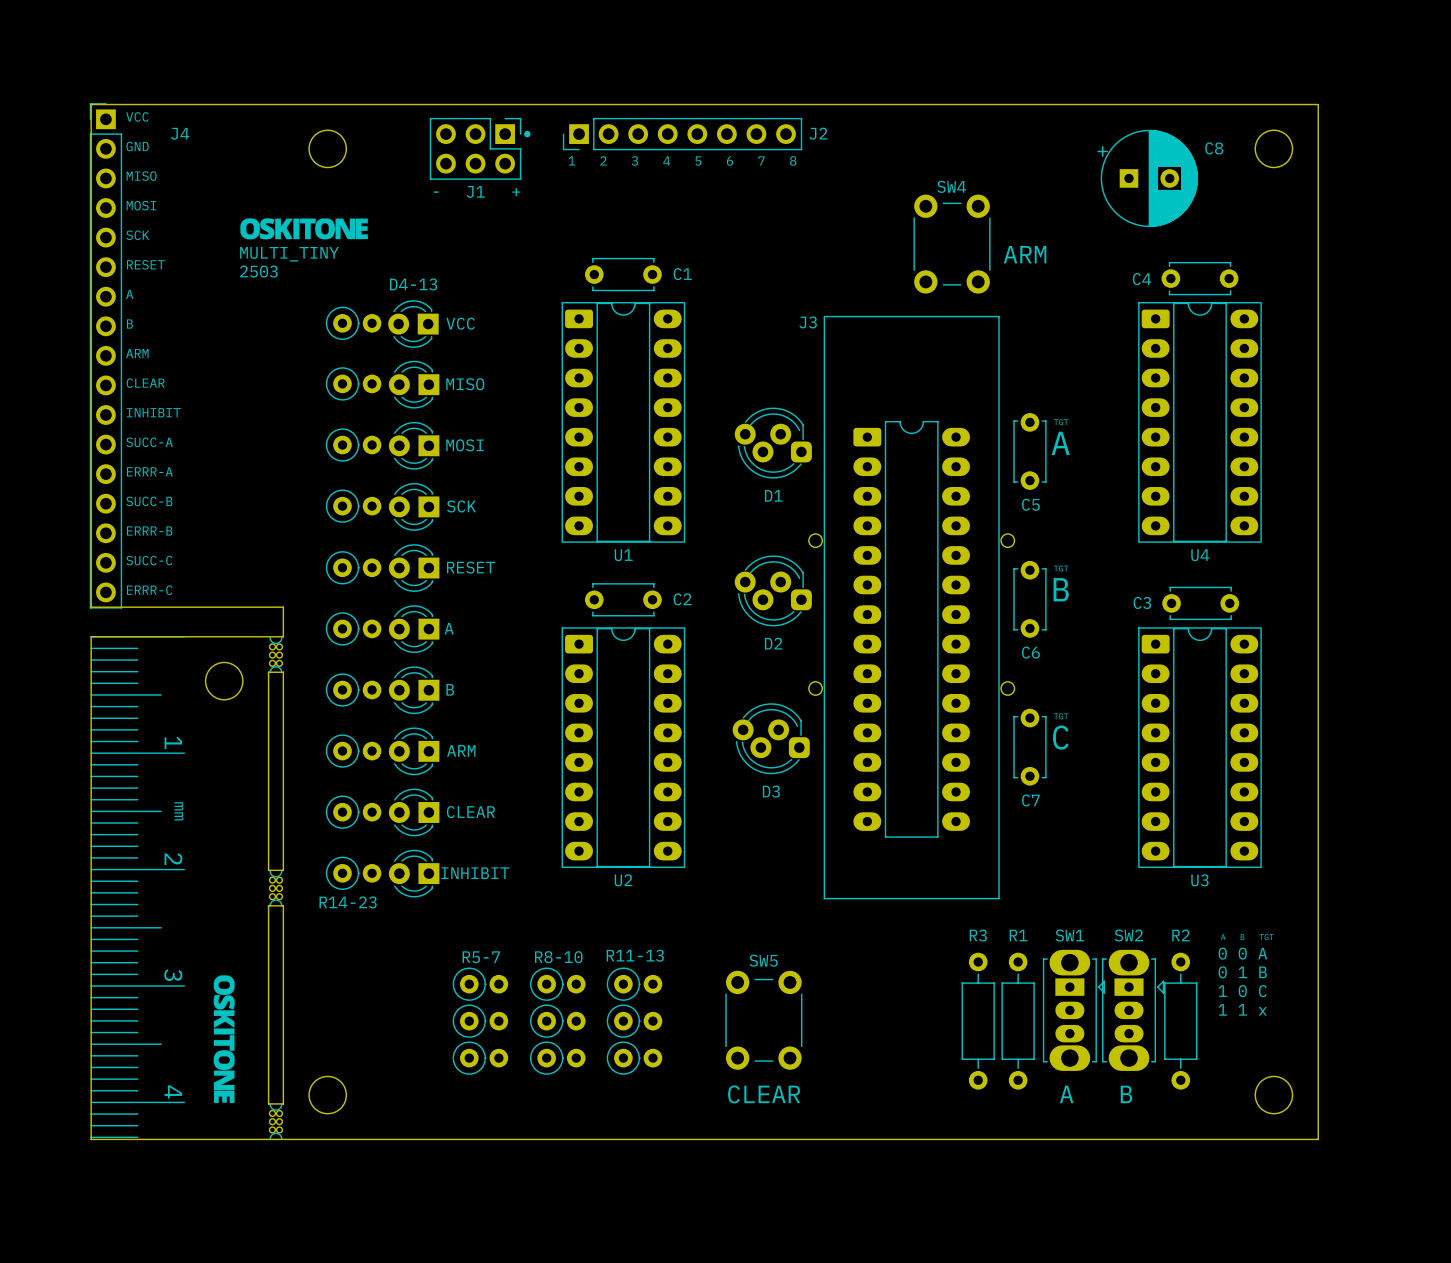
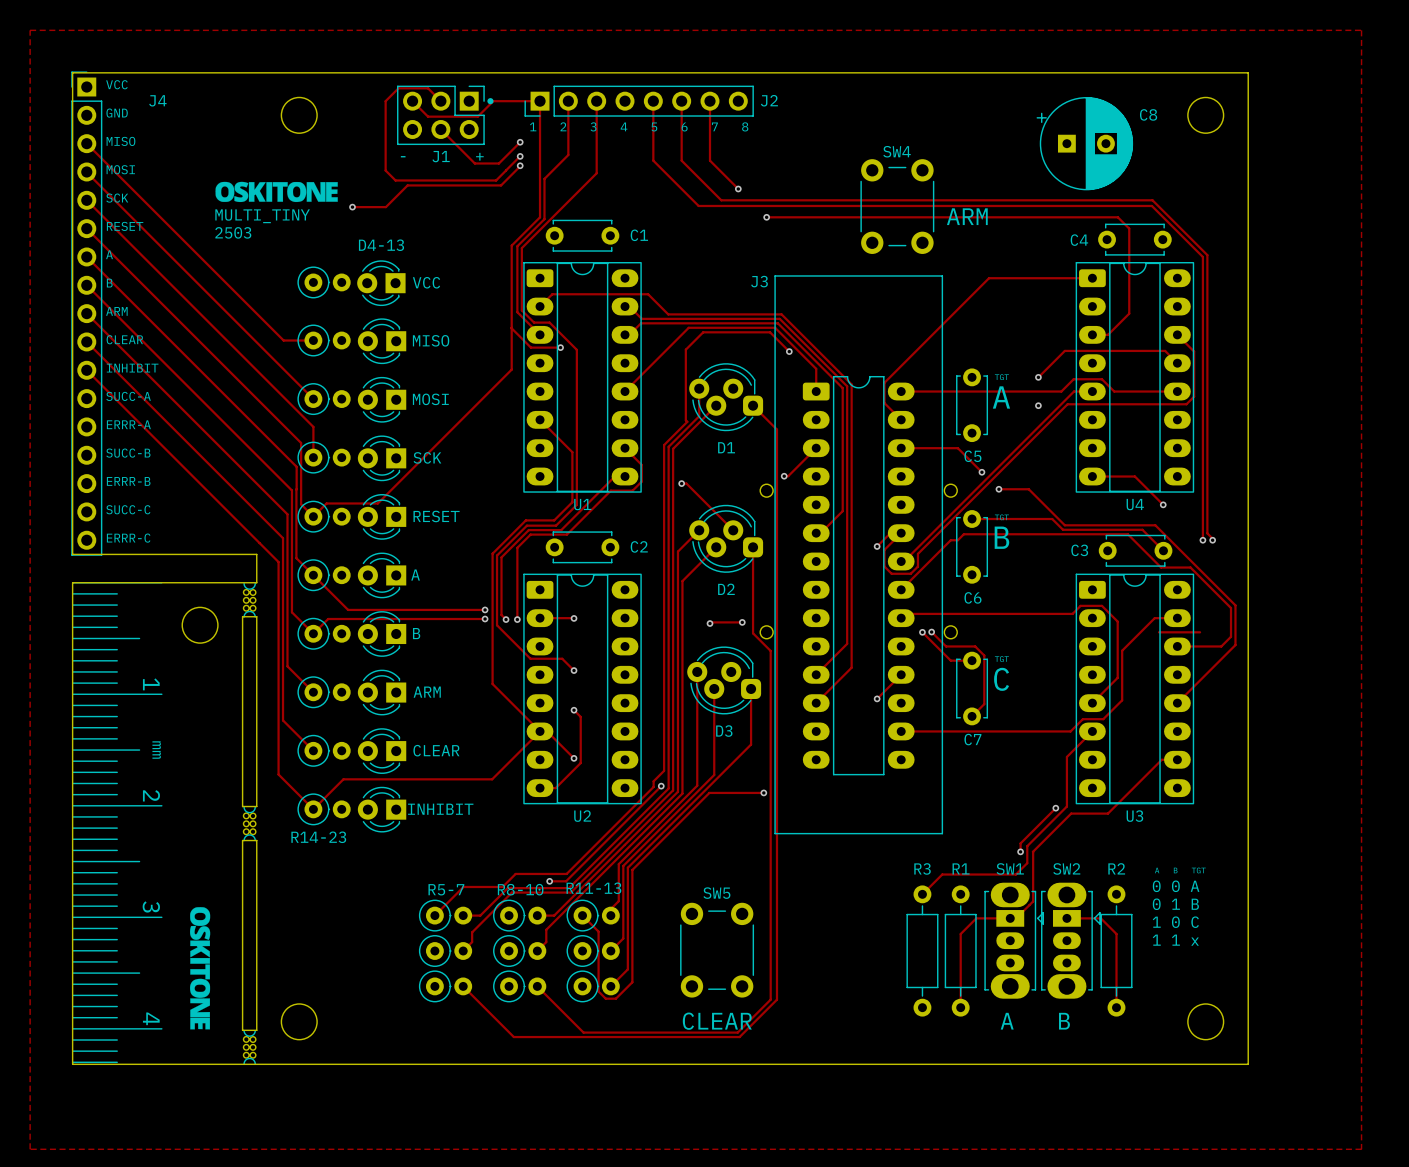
zone outline: none -> (30, 30) (1361, 30) (1361, 1149) (30, 1149) (30, 30)
track: none -> (412, 101) (428, 116) (477, 116) (493, 101) (540, 101) (540, 217) (511, 245) (511, 369) (377, 503) (326, 503) (313, 516) (301, 504) (301, 442) (86, 228)
track: none -> (440, 101) (428, 88) (398, 88) (385, 101) (385, 170) (395, 180) (496, 180) (506, 170)
track: none -> (568, 101) (568, 154) (544, 178) (544, 219) (517, 246) (517, 312) (540, 334)
track: none -> (596, 101) (596, 173) (521, 248) (521, 310) (534, 322) (549, 322) (576, 349) (576, 504) (556, 525) (526, 525) (497, 555) (497, 625) (530, 658) (562, 658) (574, 670)
track: none -> (653, 101) (653, 160) (698, 205) (1151, 205) (1202, 256) (1202, 540)
track: none -> (681, 101) (681, 160) (721, 200) (1152, 200) (1207, 255) (1207, 533) (1212, 540)
track: none -> (710, 101) (710, 160) (738, 188)
track: none -> (440, 129) (474, 163) (498, 163) (520, 142)
via: none -> (520, 142)
track: none -> (86, 143) (283, 340) (313, 340)
track: none -> (520, 156) (506, 170)
via: none -> (520, 156)
track: none -> (520, 165) (501, 185) (407, 185) (385, 207) (352, 207)
via: none -> (520, 165)
track: none -> (86, 171) (313, 399)
via: none -> (738, 188)
track: none -> (86, 200) (313, 426) (313, 457)
via: none -> (352, 207)
track: none -> (766, 217) (1117, 217) (1129, 228) (1129, 313) (1108, 334) (1092, 334)
via: none -> (766, 217)
track: none -> (86, 256) (296, 466) (296, 558) (348, 609) (485, 609)
track: none -> (1092, 278) (989, 278) (884, 382) (884, 403) (901, 419)
track: none -> (86, 285) (291, 490) (291, 612) (313, 633) (328, 619) (485, 619)
track: none -> (540, 306) (552, 294) (648, 294) (668, 314) (781, 314) (851, 384) (851, 667) (816, 703)
track: none -> (625, 306) (629, 306) (641, 318) (779, 318) (847, 386) (847, 643) (816, 674)
track: none -> (86, 313) (287, 514) (287, 666) (313, 692)
track: none -> (511, 328) (530, 347) (560, 347)
track: none -> (625, 334) (629, 334) (641, 323) (777, 323) (842, 388) (842, 511) (820, 533) (816, 533)
track: none -> (1177, 334) (1194, 351) (1194, 396) (1186, 404) (1067, 404) (917, 553) (917, 566) (910, 573) (891, 573) (884, 566) (884, 549) (901, 533) (890, 533) (877, 546)
track: none -> (86, 341) (283, 538) (283, 720) (313, 750)
via: none -> (560, 347)
track: none -> (789, 351) (770, 332) (703, 332) (685, 349) (687, 421) (664, 445) (664, 770) (653, 781) (653, 786) (566, 873) (515, 873) (502, 886) (463, 886) (434, 915)
via: none -> (789, 351)
track: none -> (1177, 363) (1165, 350) (1064, 350) (1038, 377)
track: none -> (86, 370) (278, 562) (278, 774) (313, 809) (343, 779) (492, 779) (540, 731)
via: none -> (1038, 377)
track: none -> (699, 388) (699, 416) (668, 446) (668, 788) (569, 888) (507, 888) (480, 915) (463, 915)
track: none -> (625, 391) (688, 327) (775, 327) (816, 368) (816, 391)
track: none -> (901, 391) (1061, 391) (1073, 379) (1101, 379) (1114, 391) (1177, 391)
track: none -> (1092, 391) (1074, 391) (904, 561) (901, 561)
track: none -> (716, 405) (673, 448) (673, 790) (570, 892) (511, 892) (472, 932) (472, 942) (463, 951)
track: none -> (753, 405) (776, 429) (776, 999) (739, 1037) (513, 1037) (463, 986)
via: none -> (1038, 405)
track: none -> (540, 419) (572, 452) (572, 502) (554, 520) (525, 520) (492, 553) (492, 684) (540, 731)
track: none -> (625, 448) (641, 464) (641, 481) (632, 490) (610, 490) (566, 534) (530, 534) (517, 547) (517, 619)
track: none -> (816, 448) (788, 476) (784, 476)
track: none -> (901, 448) (957, 448) (981, 472)
via: none -> (981, 472)
track: none -> (625, 476) (614, 476) (561, 530) (528, 530) (501, 557) (501, 615) (506, 619)
via: none -> (784, 476)
track: none -> (1092, 476) (1134, 476) (1163, 504)
track: none -> (681, 483) (686, 483) (733, 530)
via: none -> (681, 483)
track: none -> (998, 489) (1028, 489) (1064, 525) (1155, 525) (1235, 605) (1235, 645) (1177, 703)
via: none -> (998, 489)
via: none -> (1163, 504)
track: none -> (972, 519) (1052, 519) (1063, 529) (1142, 529) (1163, 550)
track: none -> (699, 530) (677, 551) (677, 791) (554, 915) (537, 915)
via: none -> (1202, 540)
via: none -> (1212, 540)
via: none -> (877, 546)
track: none -> (716, 547) (682, 581) (682, 793) (546, 929) (546, 942) (537, 951)
track: none -> (753, 547) (753, 633) (770, 650) (770, 999) (737, 1032) (583, 1032) (537, 986)
track: none -> (901, 589) (950, 540) (957, 540) (963, 534) (1127, 534) (1161, 567) (1190, 567) (1231, 608) (1231, 636) (1221, 646) (1177, 646)
via: none -> (485, 609)
track: none -> (540, 618) (574, 618)
track: none -> (901, 618) (905, 613) (1072, 613) (1080, 605) (1101, 605) (1117, 621) (1117, 677) (1092, 703)
track: none -> (1177, 618) (1154, 618) (1122, 650) (1122, 700) (1103, 719) (1082, 719) (1070, 731) (901, 731)
via: none -> (485, 619)
via: none -> (574, 618)
via: none -> (506, 619)
via: none -> (517, 619)
track: none -> (742, 622) (710, 623)
via: none -> (742, 622)
via: none -> (710, 623)
track: none -> (922, 632) (950, 660) (972, 660)
via: none -> (922, 632)
track: none -> (931, 632) (946, 646) (975, 646) (984, 655) (984, 704) (972, 716)
via: none -> (931, 632)
track: none -> (1158, 632) (1200, 632)
via: none -> (574, 670)
track: none -> (697, 671) (697, 785) (618, 864) (618, 901) (610, 909) (610, 915)
track: none -> (901, 674) (877, 698)
track: none -> (714, 688) (714, 775) (623, 865) (623, 938) (610, 951)
track: none -> (751, 688) (751, 744) (627, 867) (627, 969) (610, 986)
via: none -> (877, 698)
track: none -> (574, 710) (580, 716) (580, 763) (555, 788) (540, 788)
via: none -> (574, 710)
track: none -> (540, 731) (547, 731) (574, 758)
track: none -> (1092, 731) (1066, 756) (1066, 806) (1027, 846) (1027, 863) (1015, 874) (942, 874) (922, 894)
via: none -> (574, 758)
track: none -> (1177, 759) (1161, 759) (1107, 813) (1071, 813) (1032, 851) (1033, 901) (1016, 918) (976, 918) (960, 934) (960, 1007)
track: none -> (661, 786) (566, 881) (549, 881)
via: none -> (661, 786)
track: none -> (763, 792) (709, 792) (632, 869) (632, 982) (615, 998) (605, 998) (598, 991) (598, 931) (582, 915)
via: none -> (763, 792)
track: none -> (1055, 808) (1020, 843) (1020, 851)
via: none -> (1055, 808)
via: none -> (1020, 851)
via: none -> (549, 881)
track: none -> (1066, 918) (1100, 918) (1116, 934) (1116, 1007)

